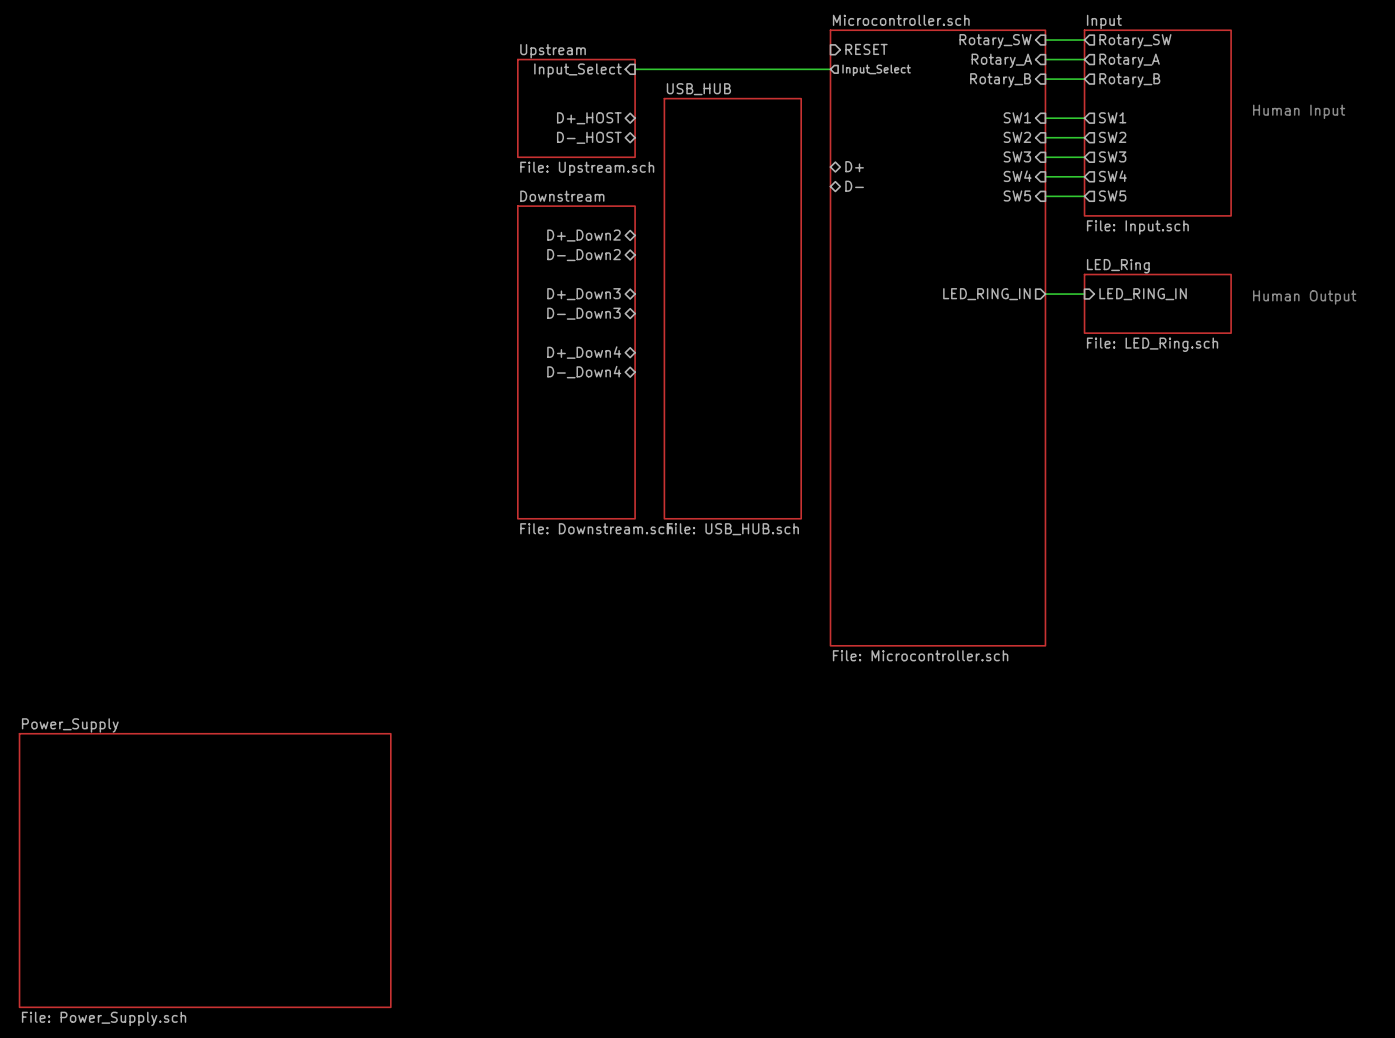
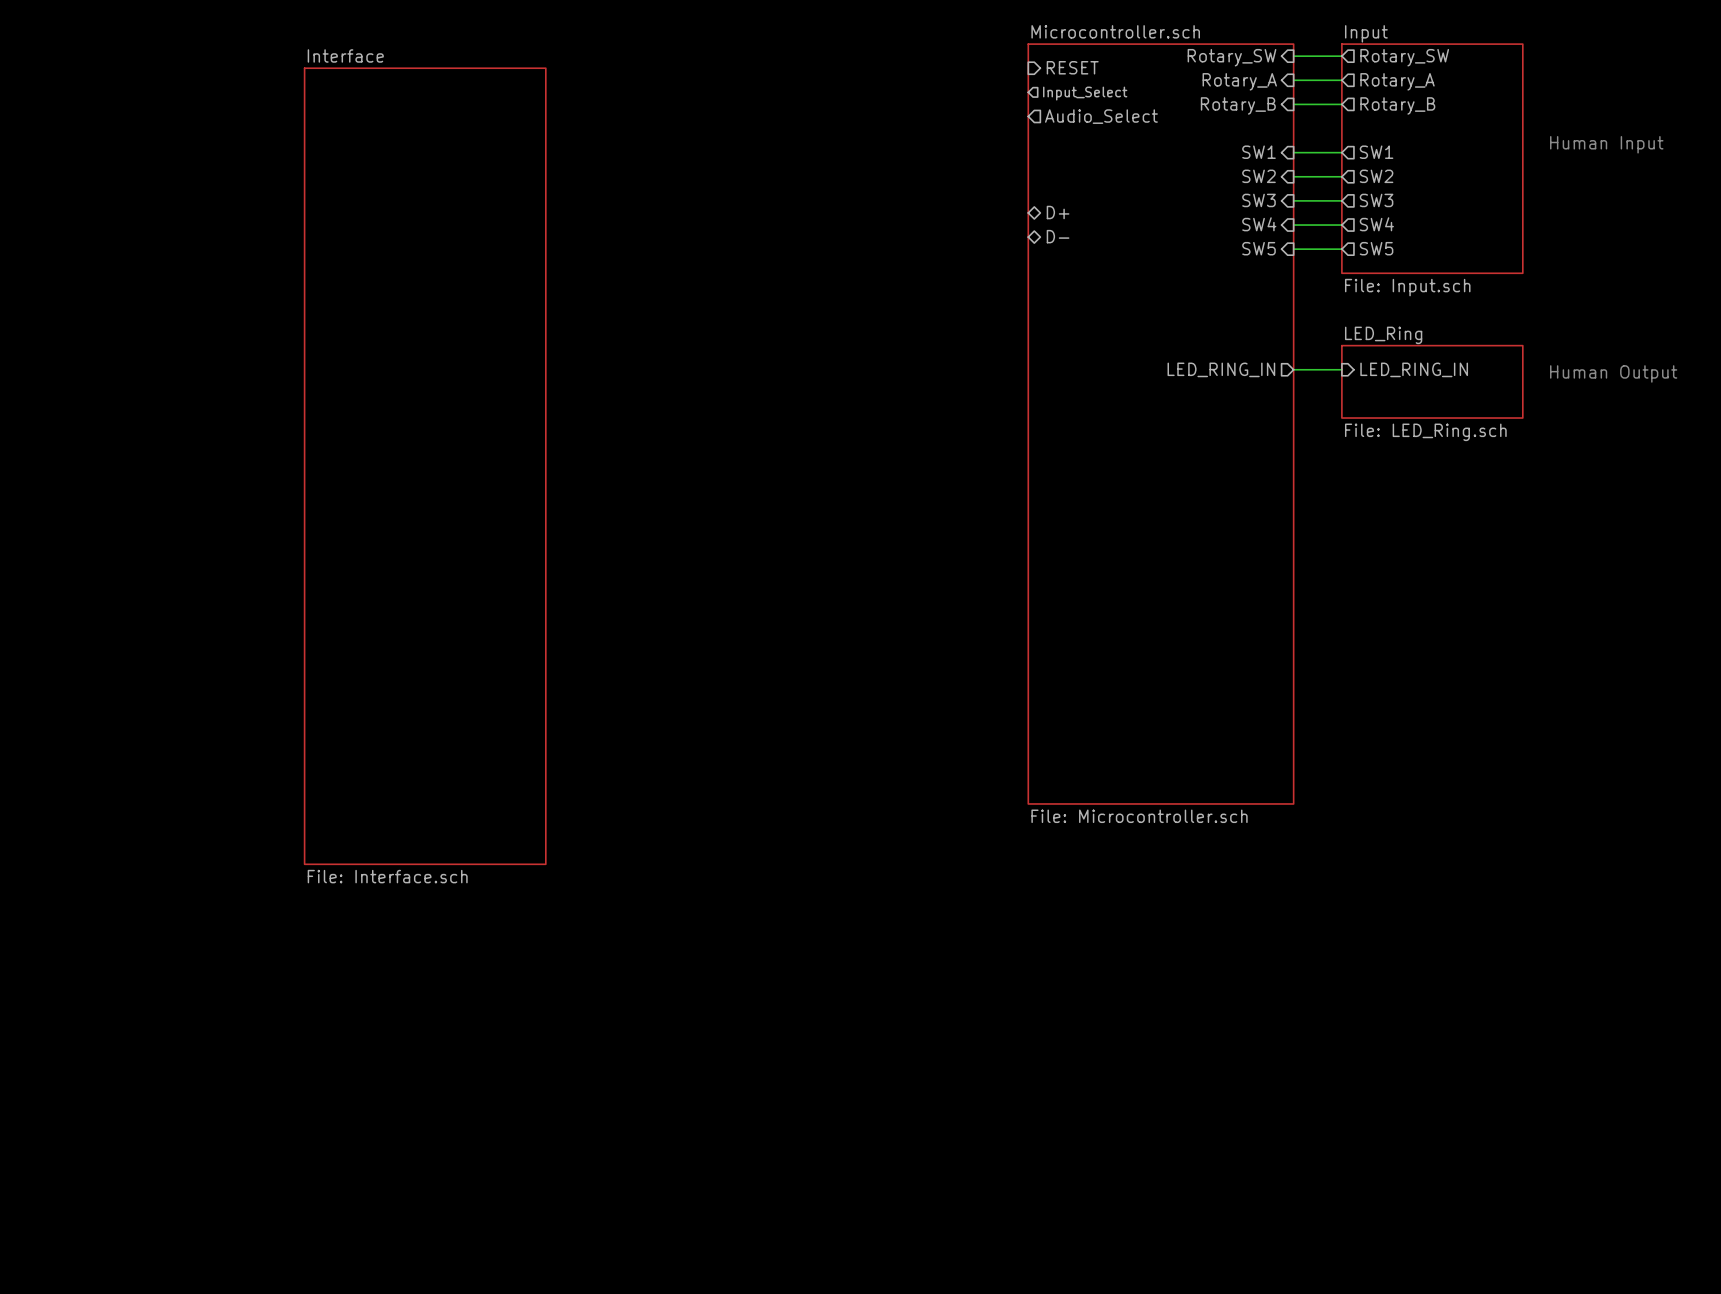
wire: (635, 69) (830, 69) -> none
sheet pin: Input_Select (577, 70) -> none
sheet pin: none -> Audio_Select (1101, 116)
sheet Upstream: File: Upstream.sch (576, 108) -> none
sheet pin: D+_HOST (589, 118) -> none
sheet pin: D-_HOST (589, 137) -> none
sheet pin: D+_Down2 (583, 235) -> none
sheet pin: D-_Down2 (583, 255) -> none
sheet pin: D+_Down3 (583, 294) -> none
sheet USB_HUB: File: USB_HUB.sch (732, 308) -> none
sheet pin: D-_Down3 (583, 313) -> none
sheet pin: D+_Down4 (584, 352) -> none
sheet Downstream: File: Downstream.sch (576, 362) -> none
sheet Interface: none -> File: Interface.sch (425, 466)
sheet pin: D-_Down4 (584, 372) -> none
sheet Power_Supply: File: Power_Supply.sch (205, 870) -> none

